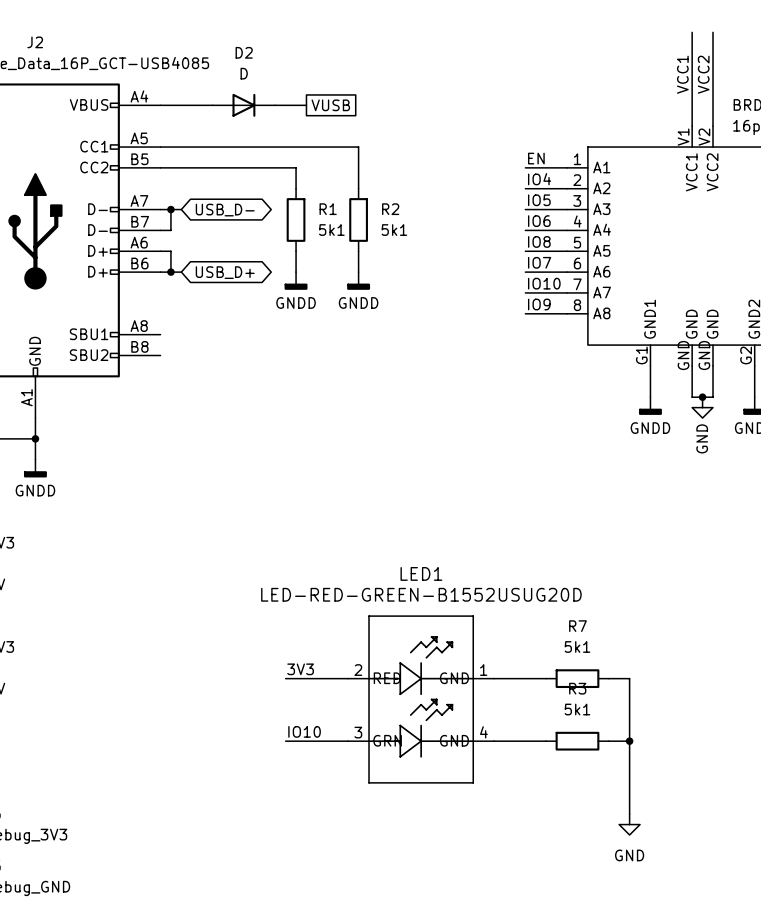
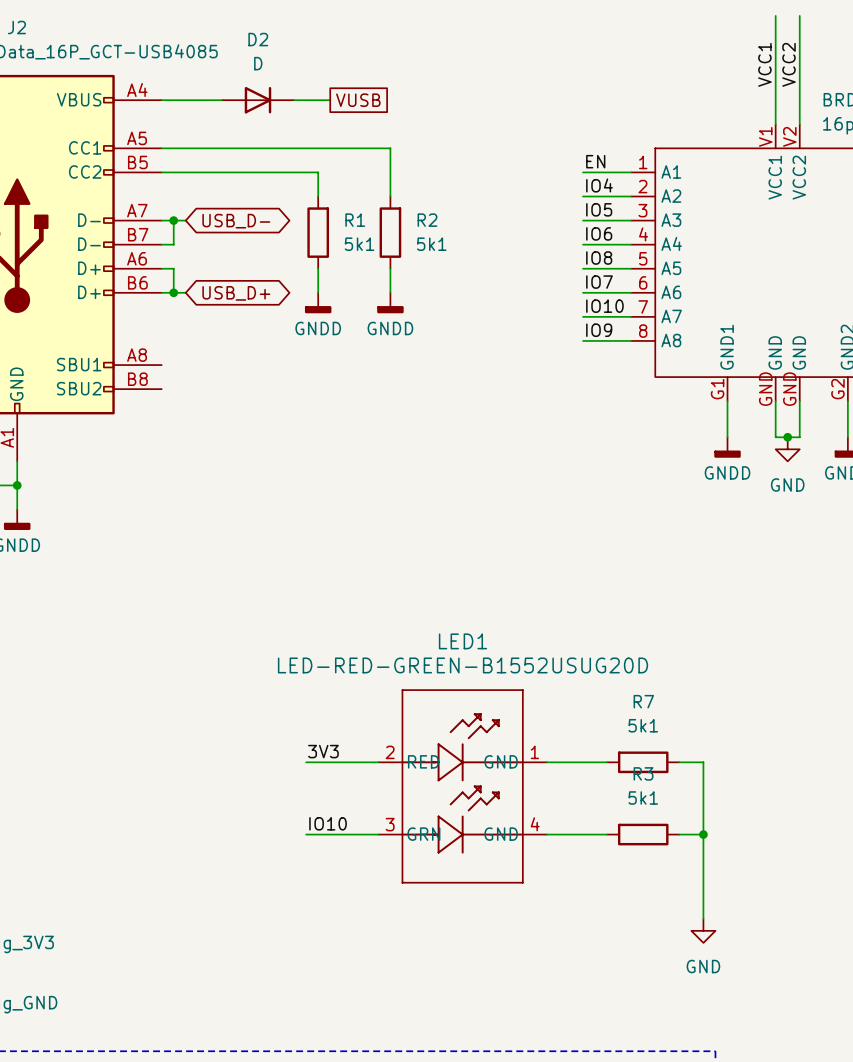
power symbol text rotation: 0° (702, 438) -> 90° clockwise (787, 484)

